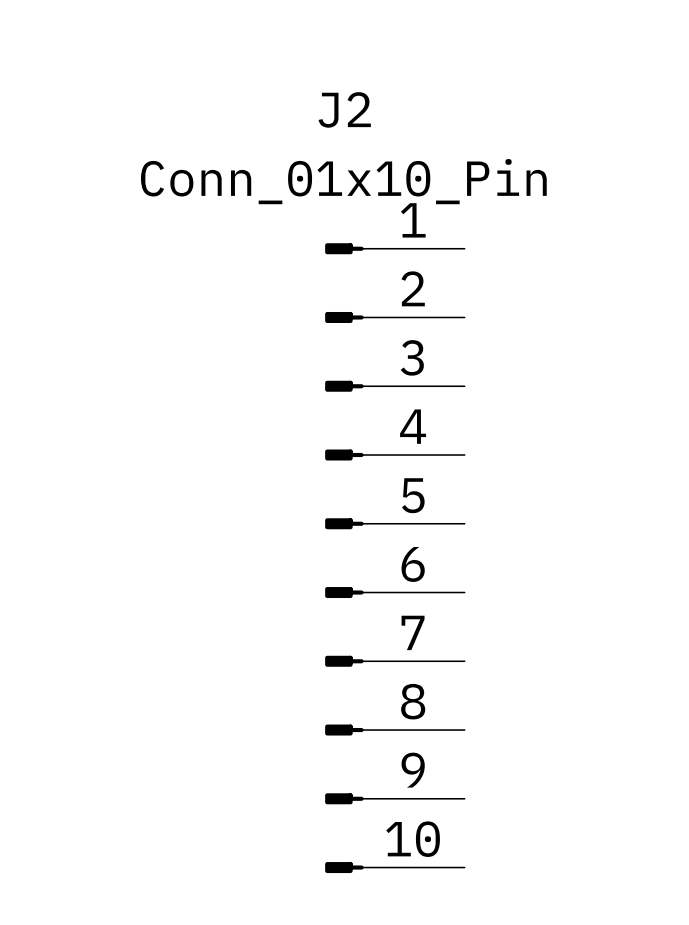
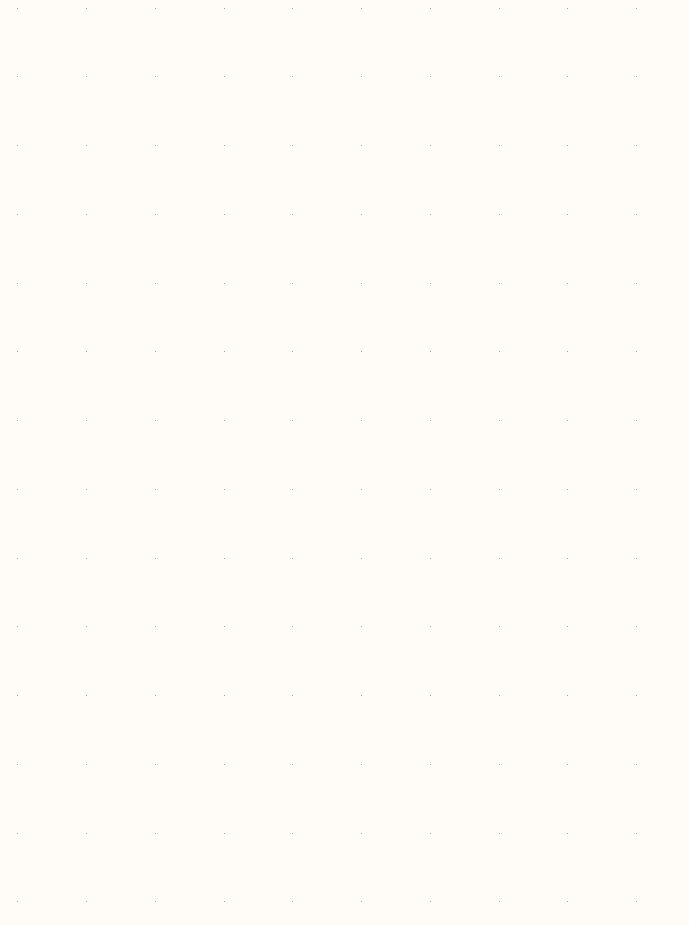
J2: Conn_01x10_Pin (394, 558) -> none

